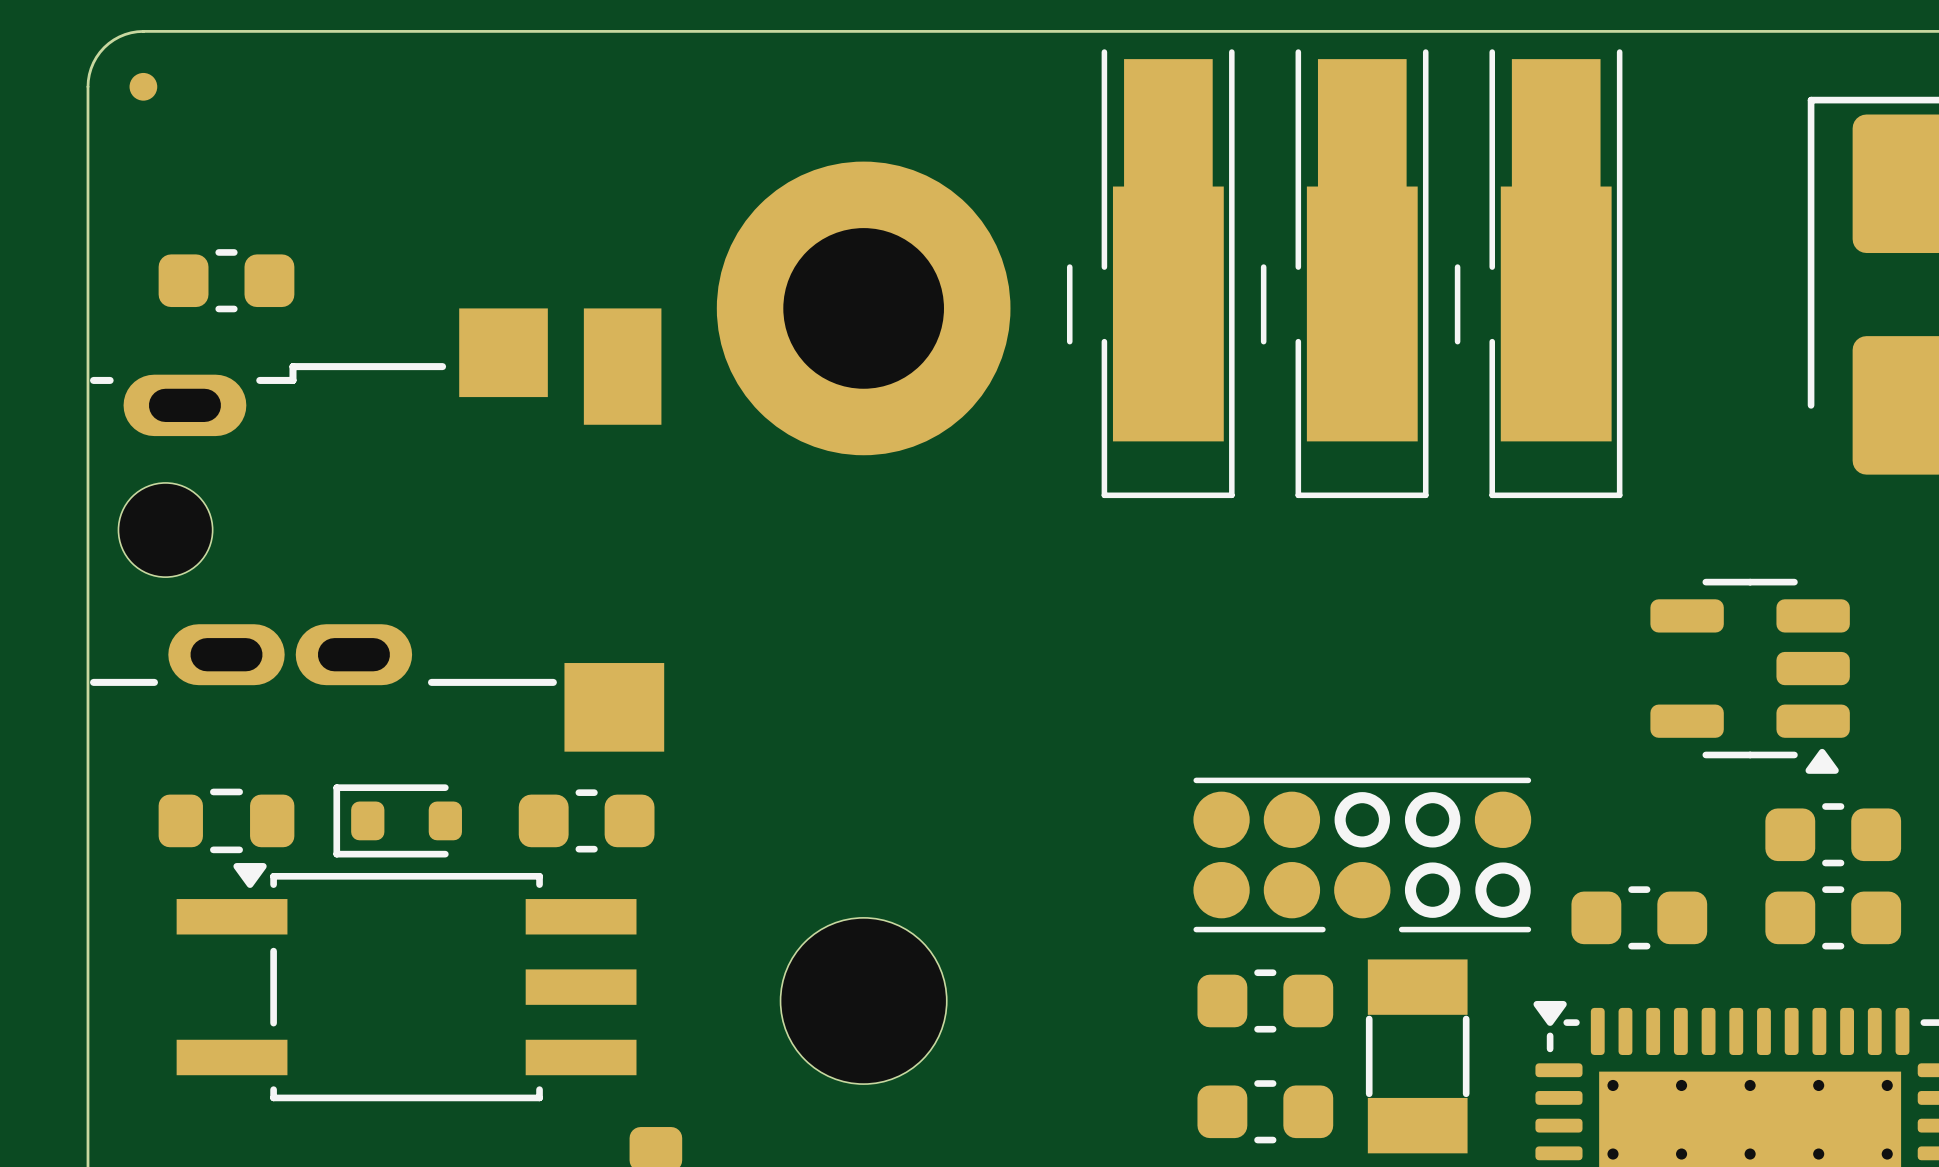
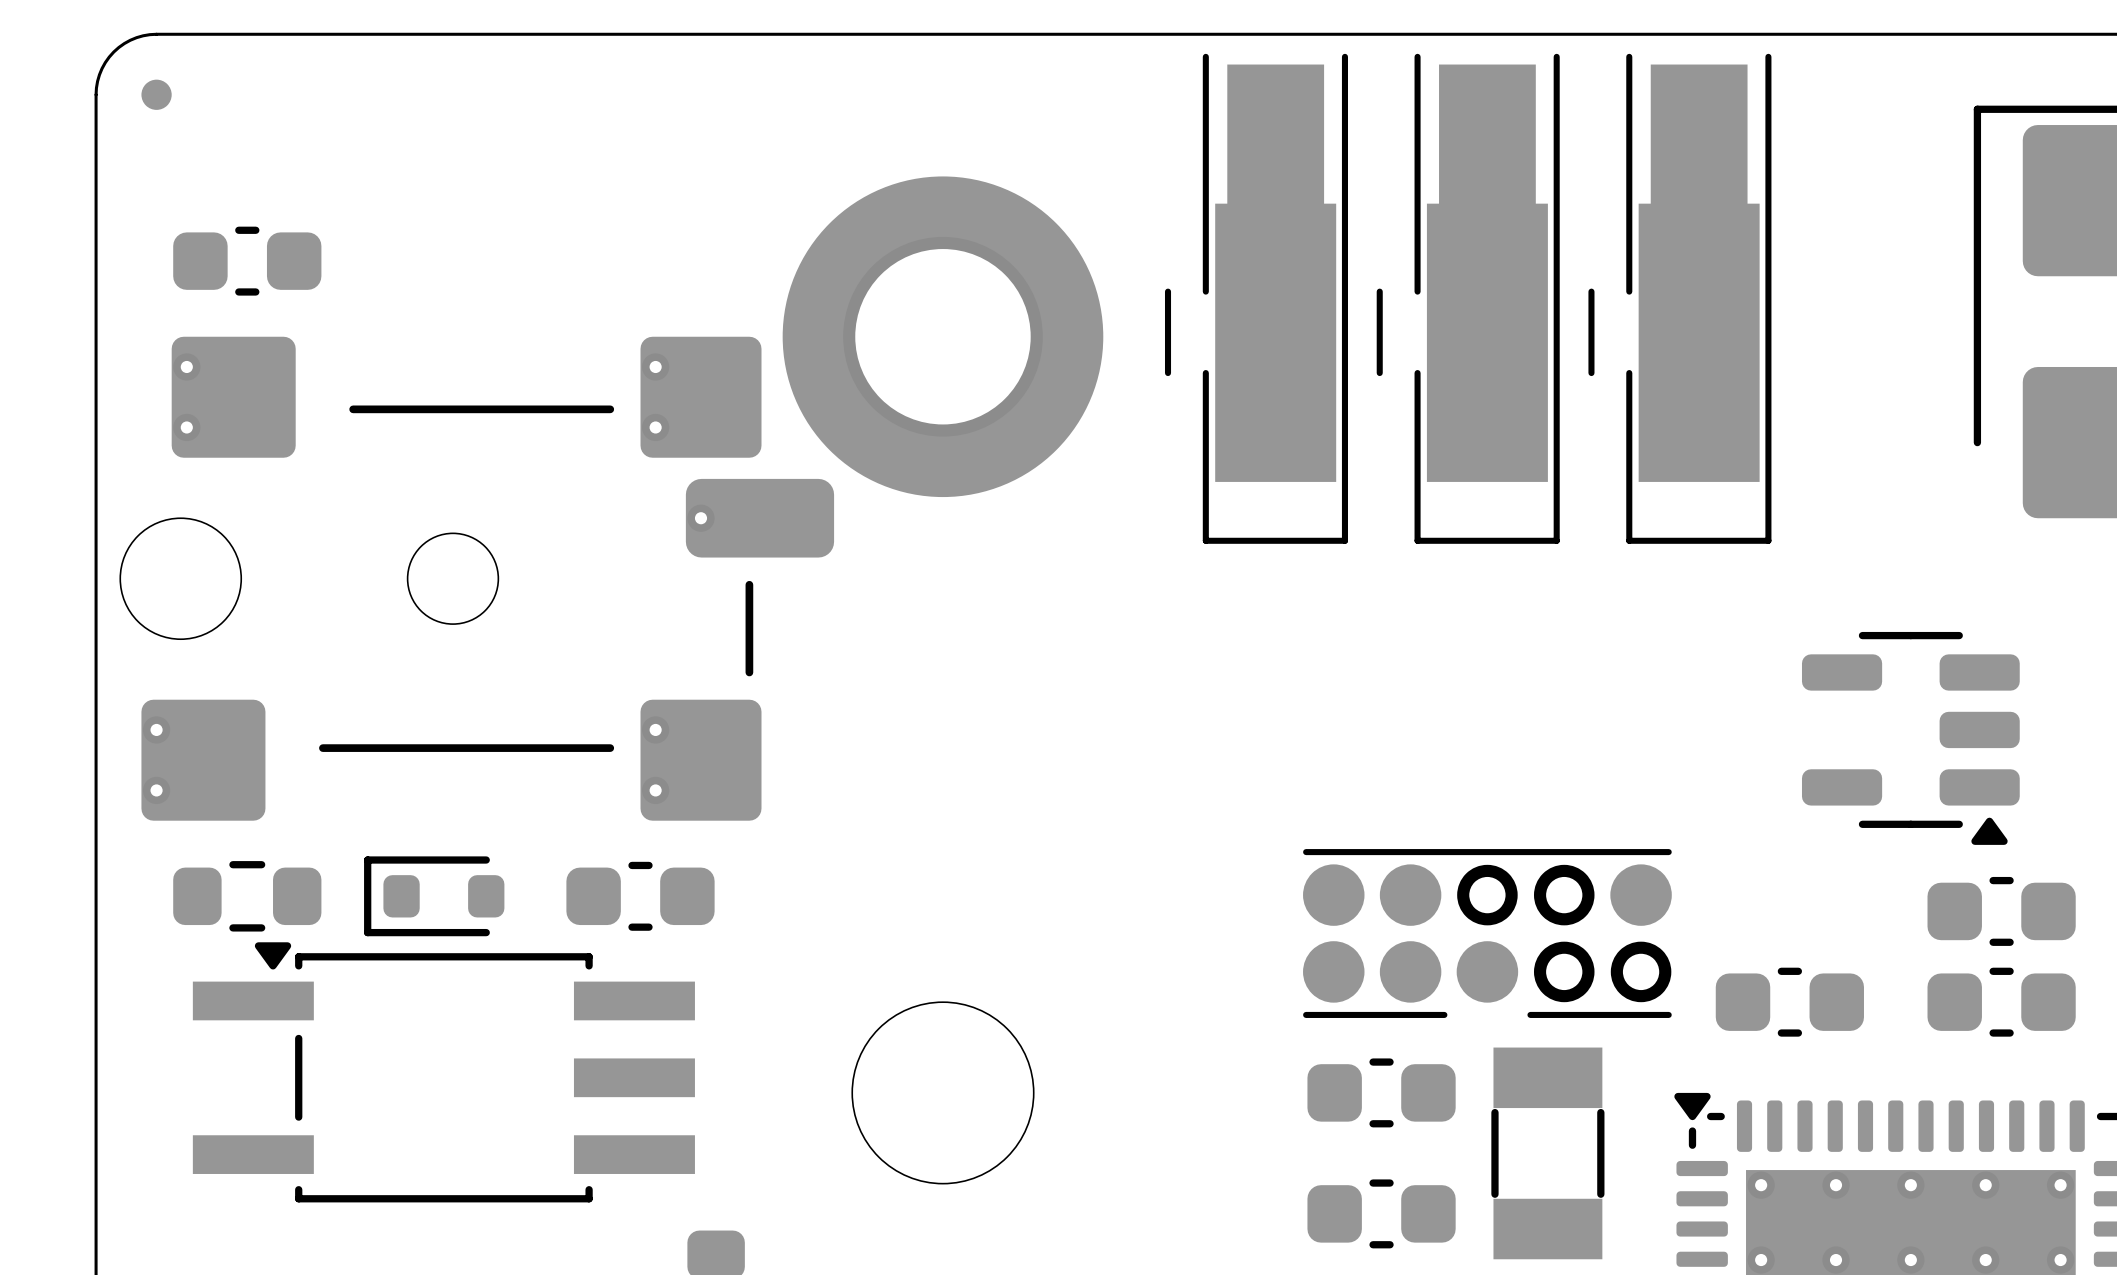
part position: (226, 280) -> (247, 261)
part: (377, 530) -> none
part: none -> (477, 578)

